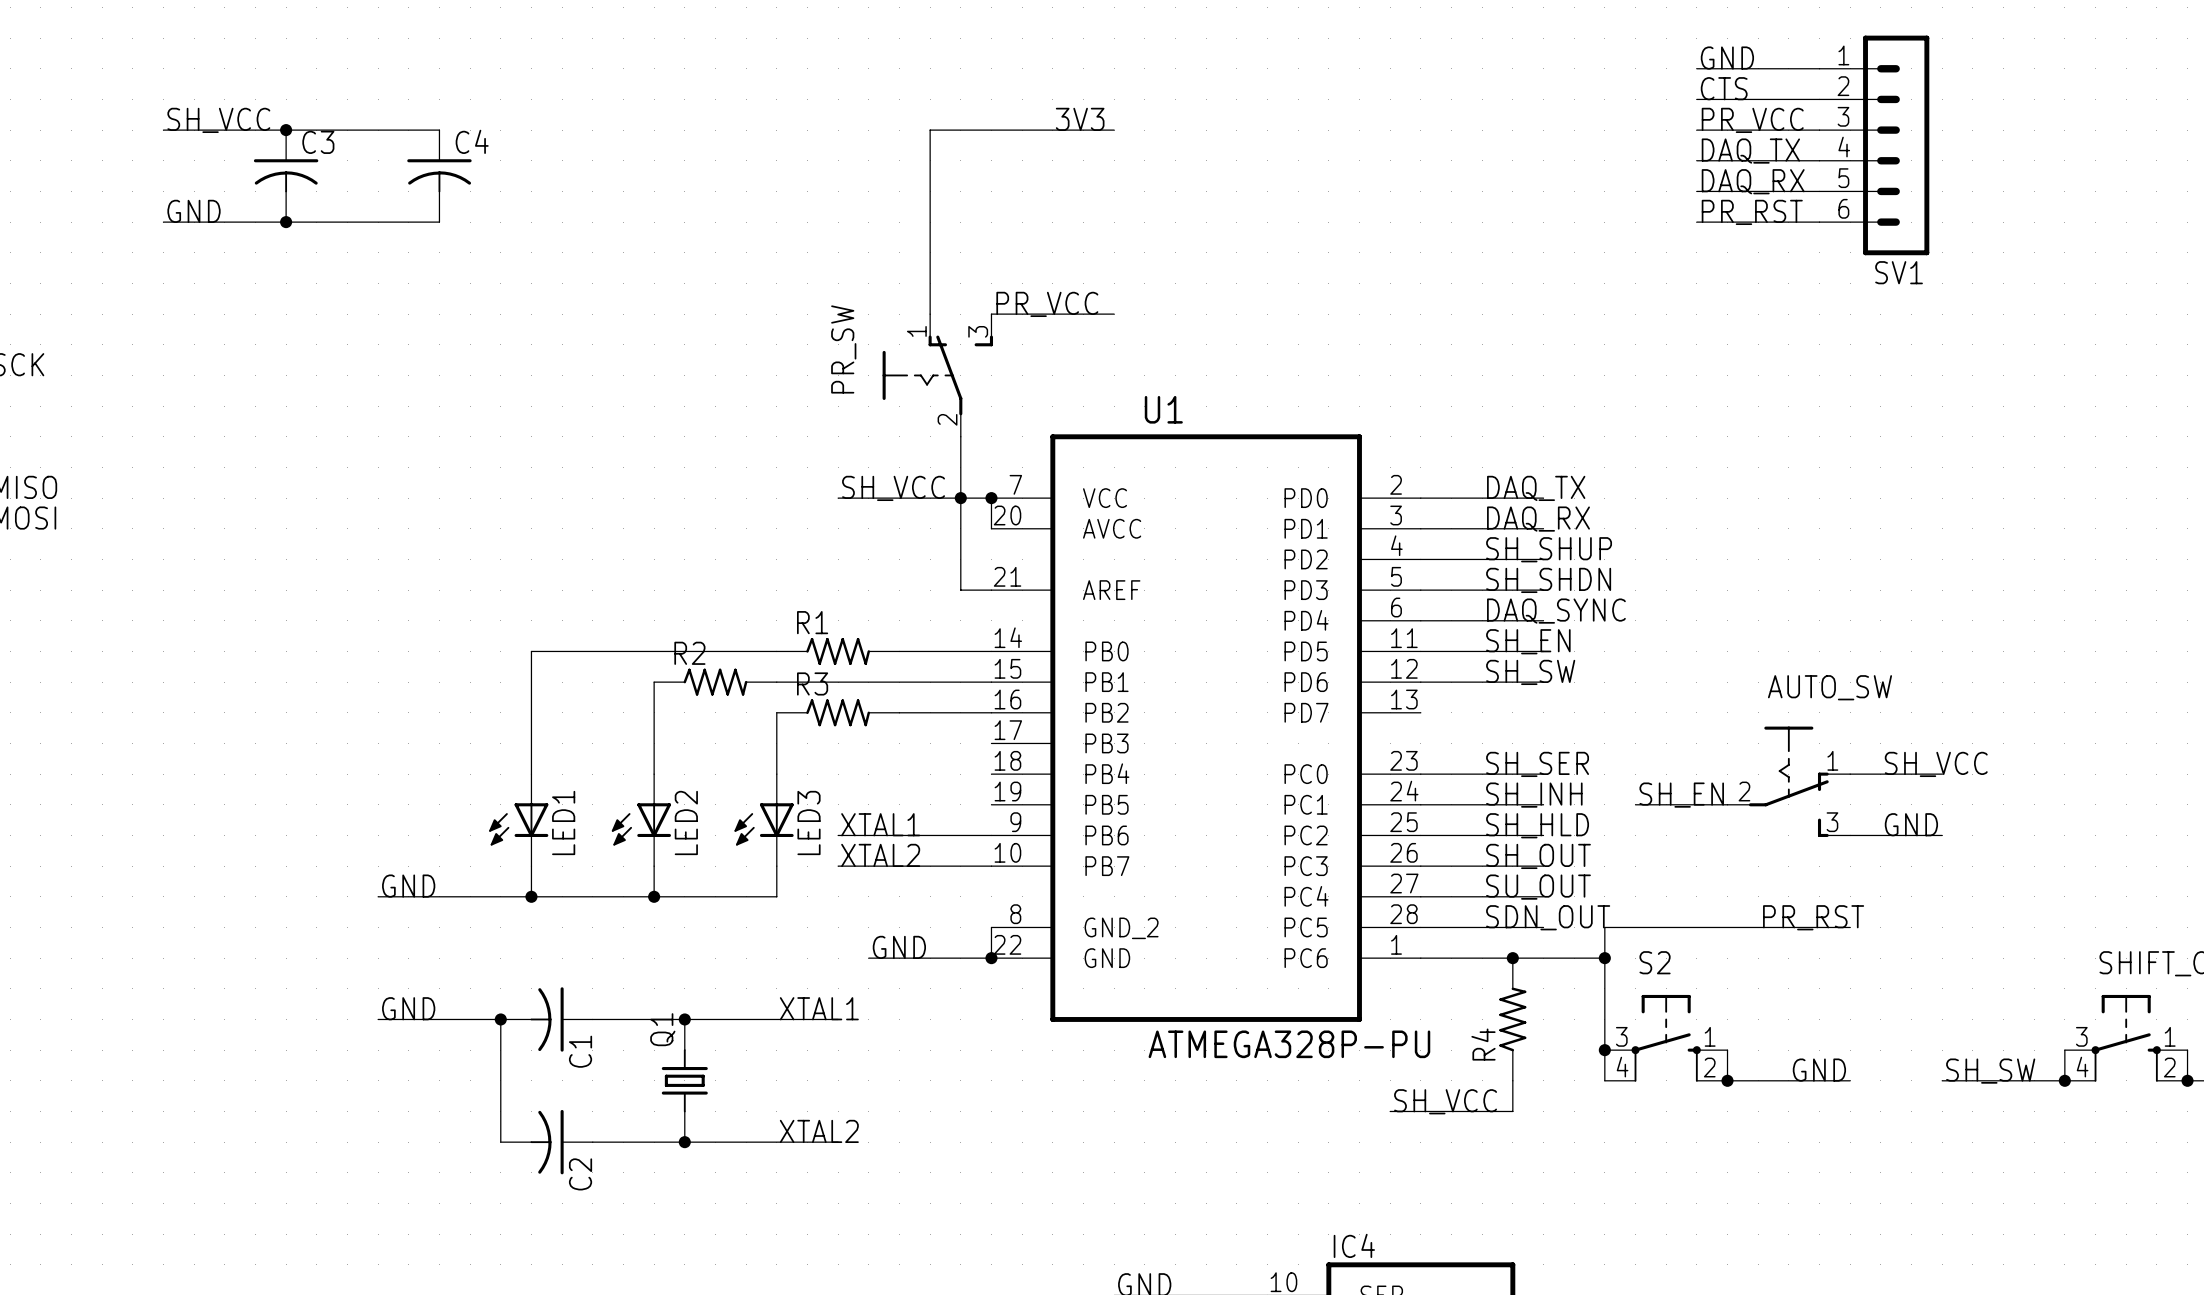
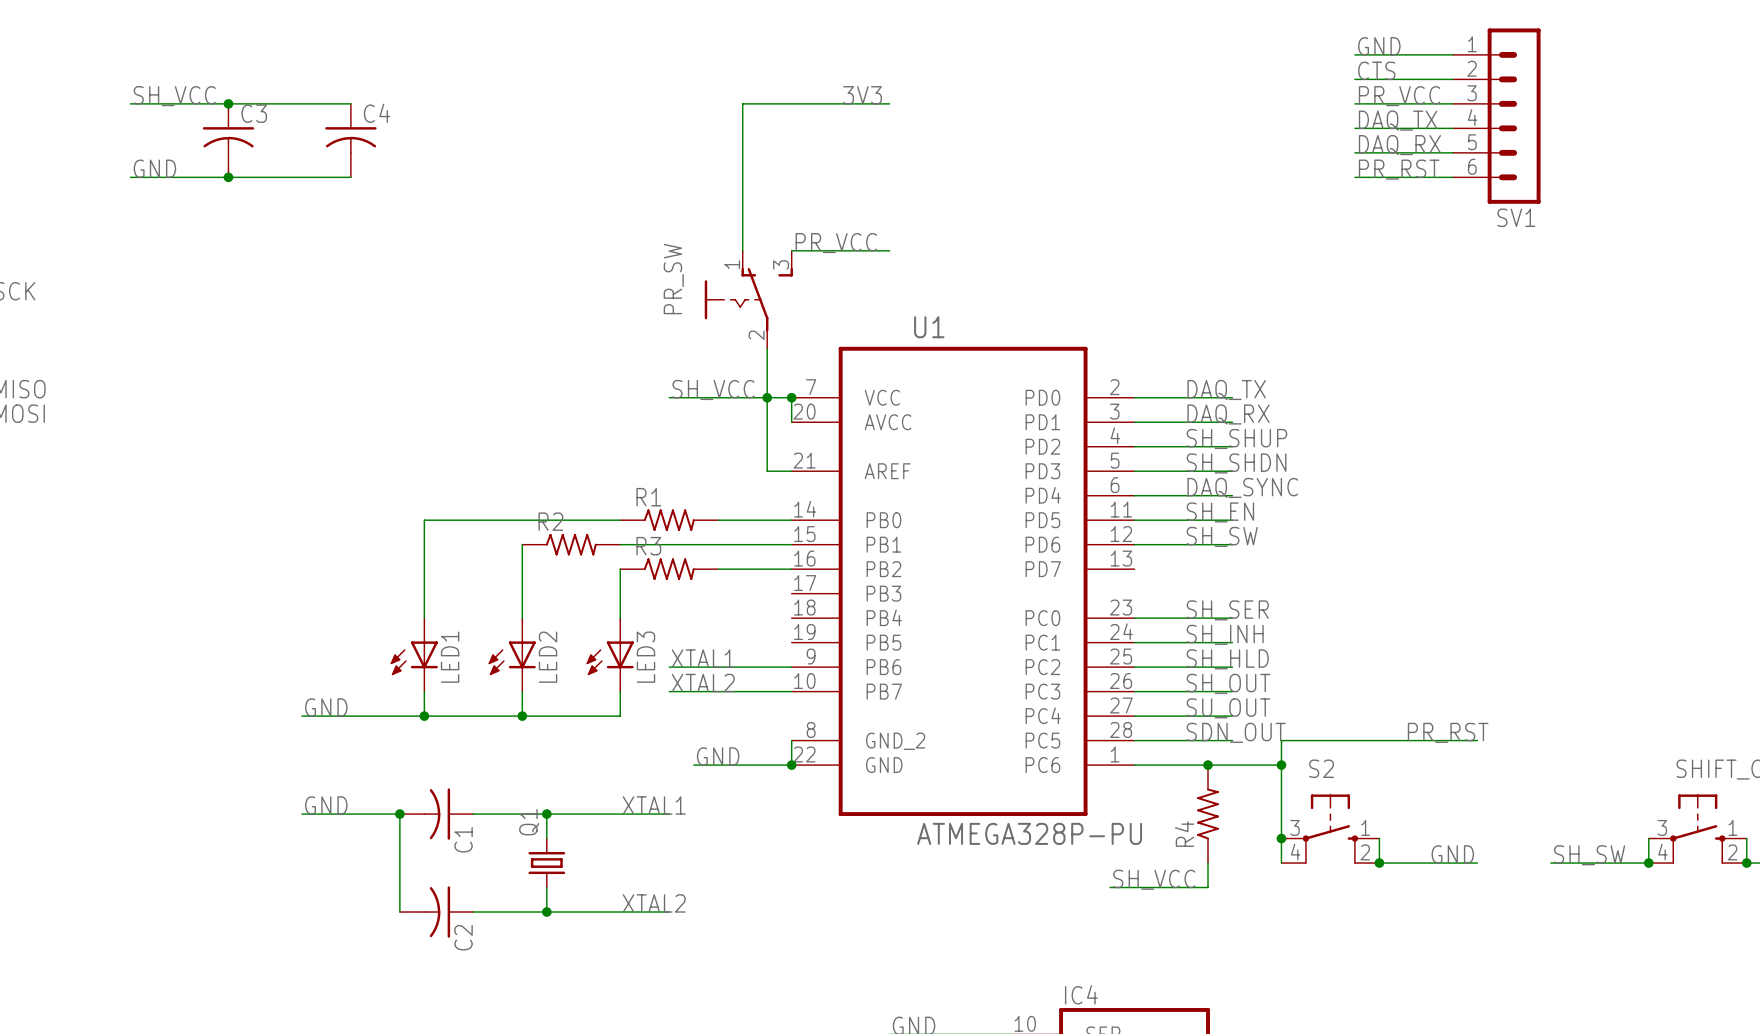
label: SH_VCC (1936, 764) -> none
wire: (1850, 774) (1942, 774) -> none
AUTO_SW: (1788, 781) -> none
label: SH_EN (1681, 795) -> none
wire: (1635, 804) (1727, 804) -> none
label: GND (1911, 824) -> none
wire: (1850, 835) (1942, 835) -> none

